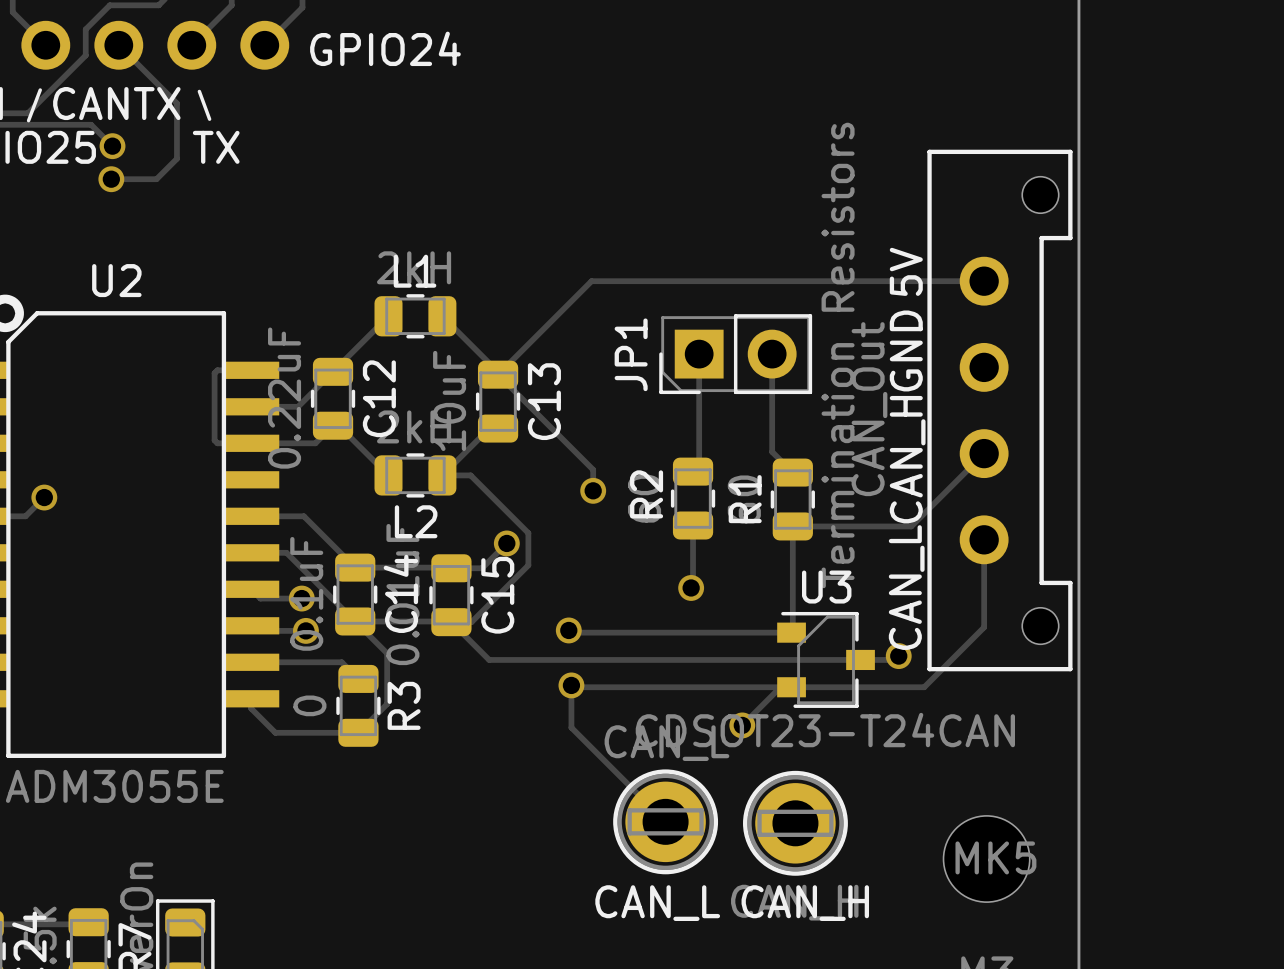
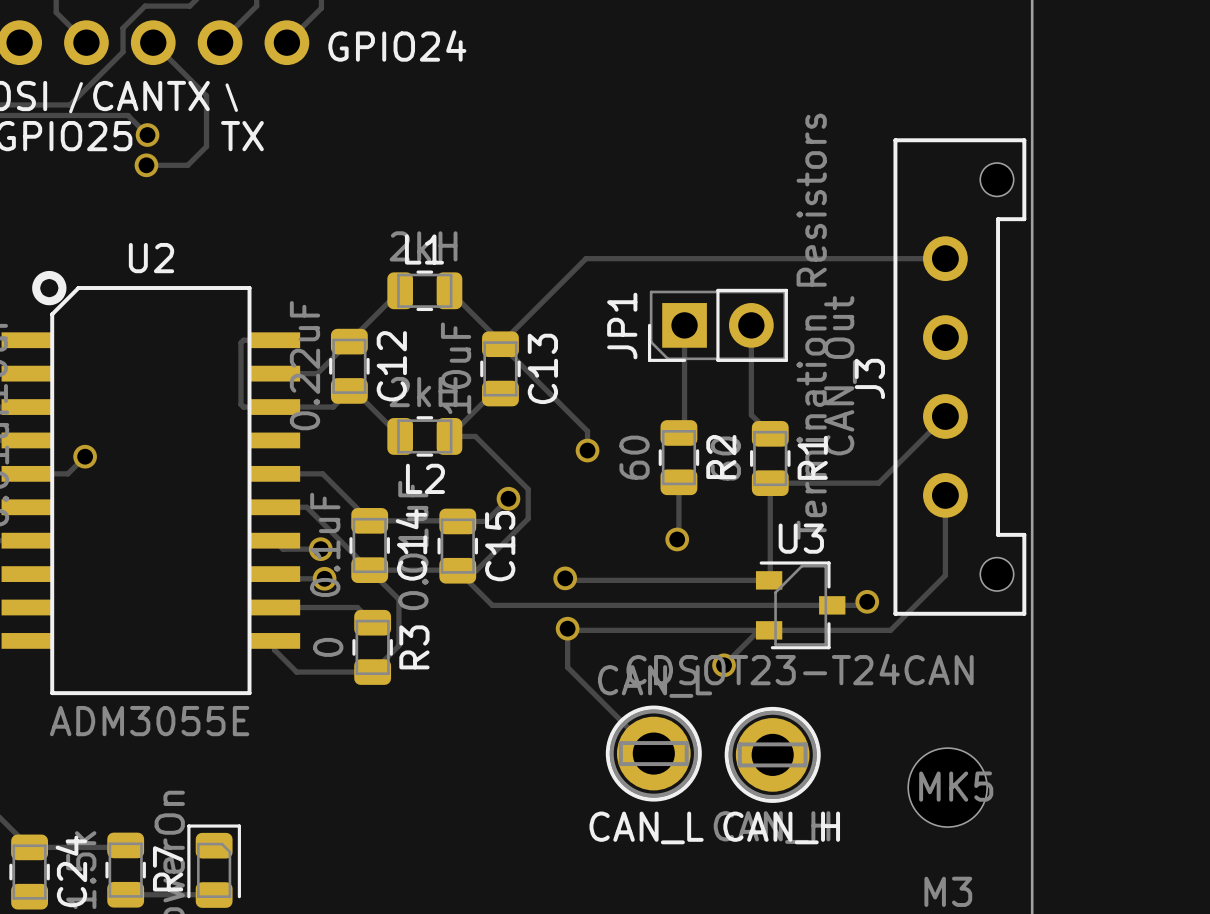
text: 5V (906, 271) -> none
text: GND (906, 350) -> none
J3 name: none -> J3 (869, 378)
text: CAN_H (907, 459) -> none
R2 name position: R2 (646, 494) -> R2 (721, 457)
R1 name position: R1 (745, 499) -> R1 (812, 457)
text: CAN_L (906, 587) -> none

